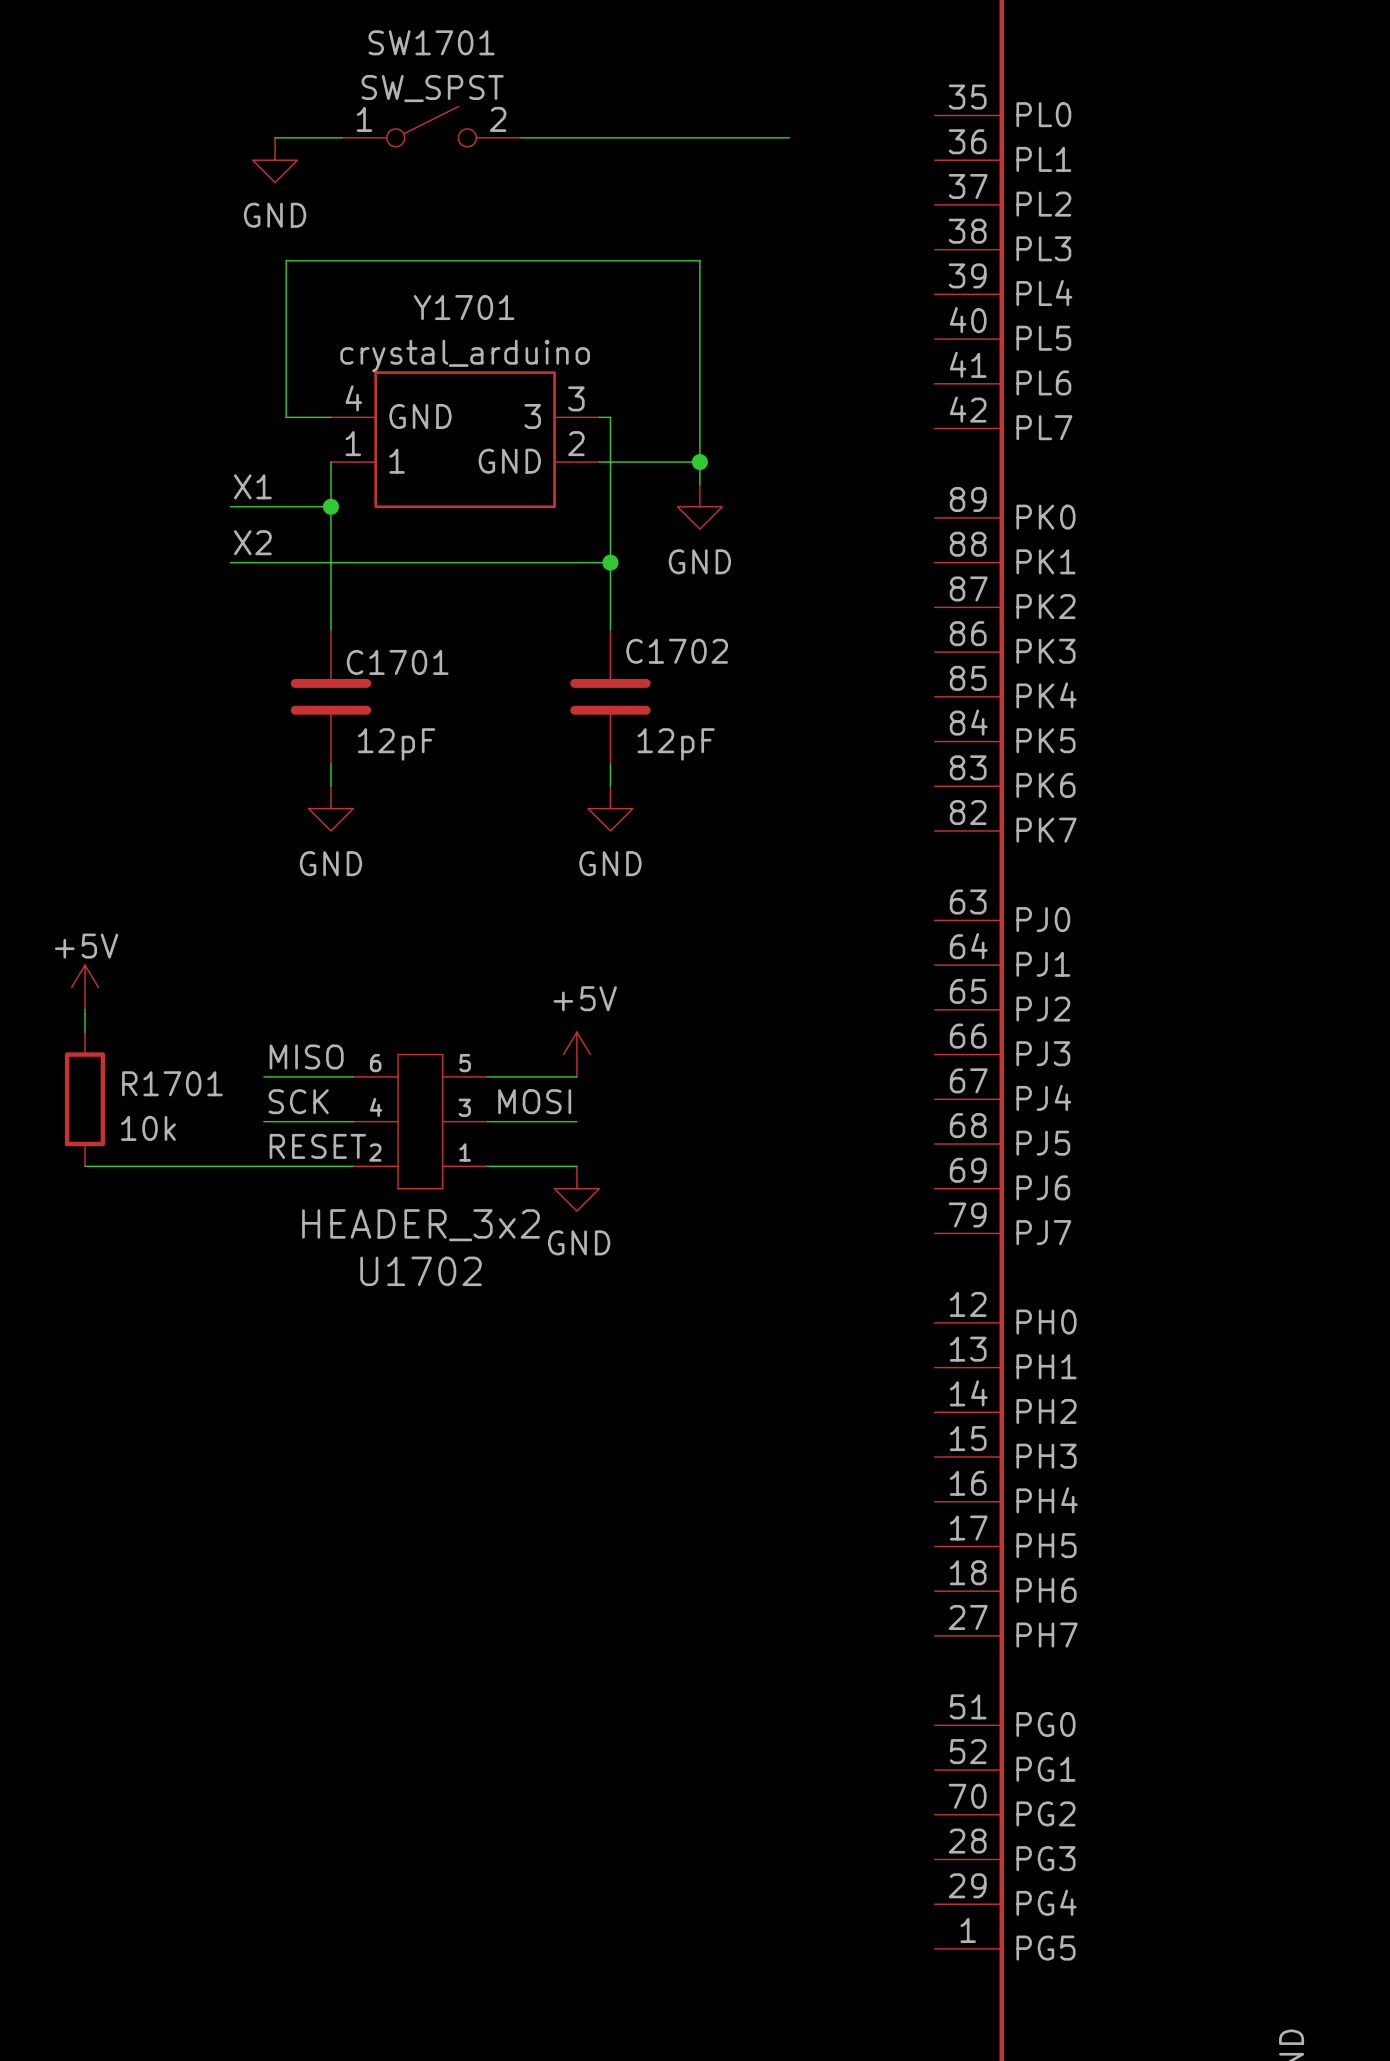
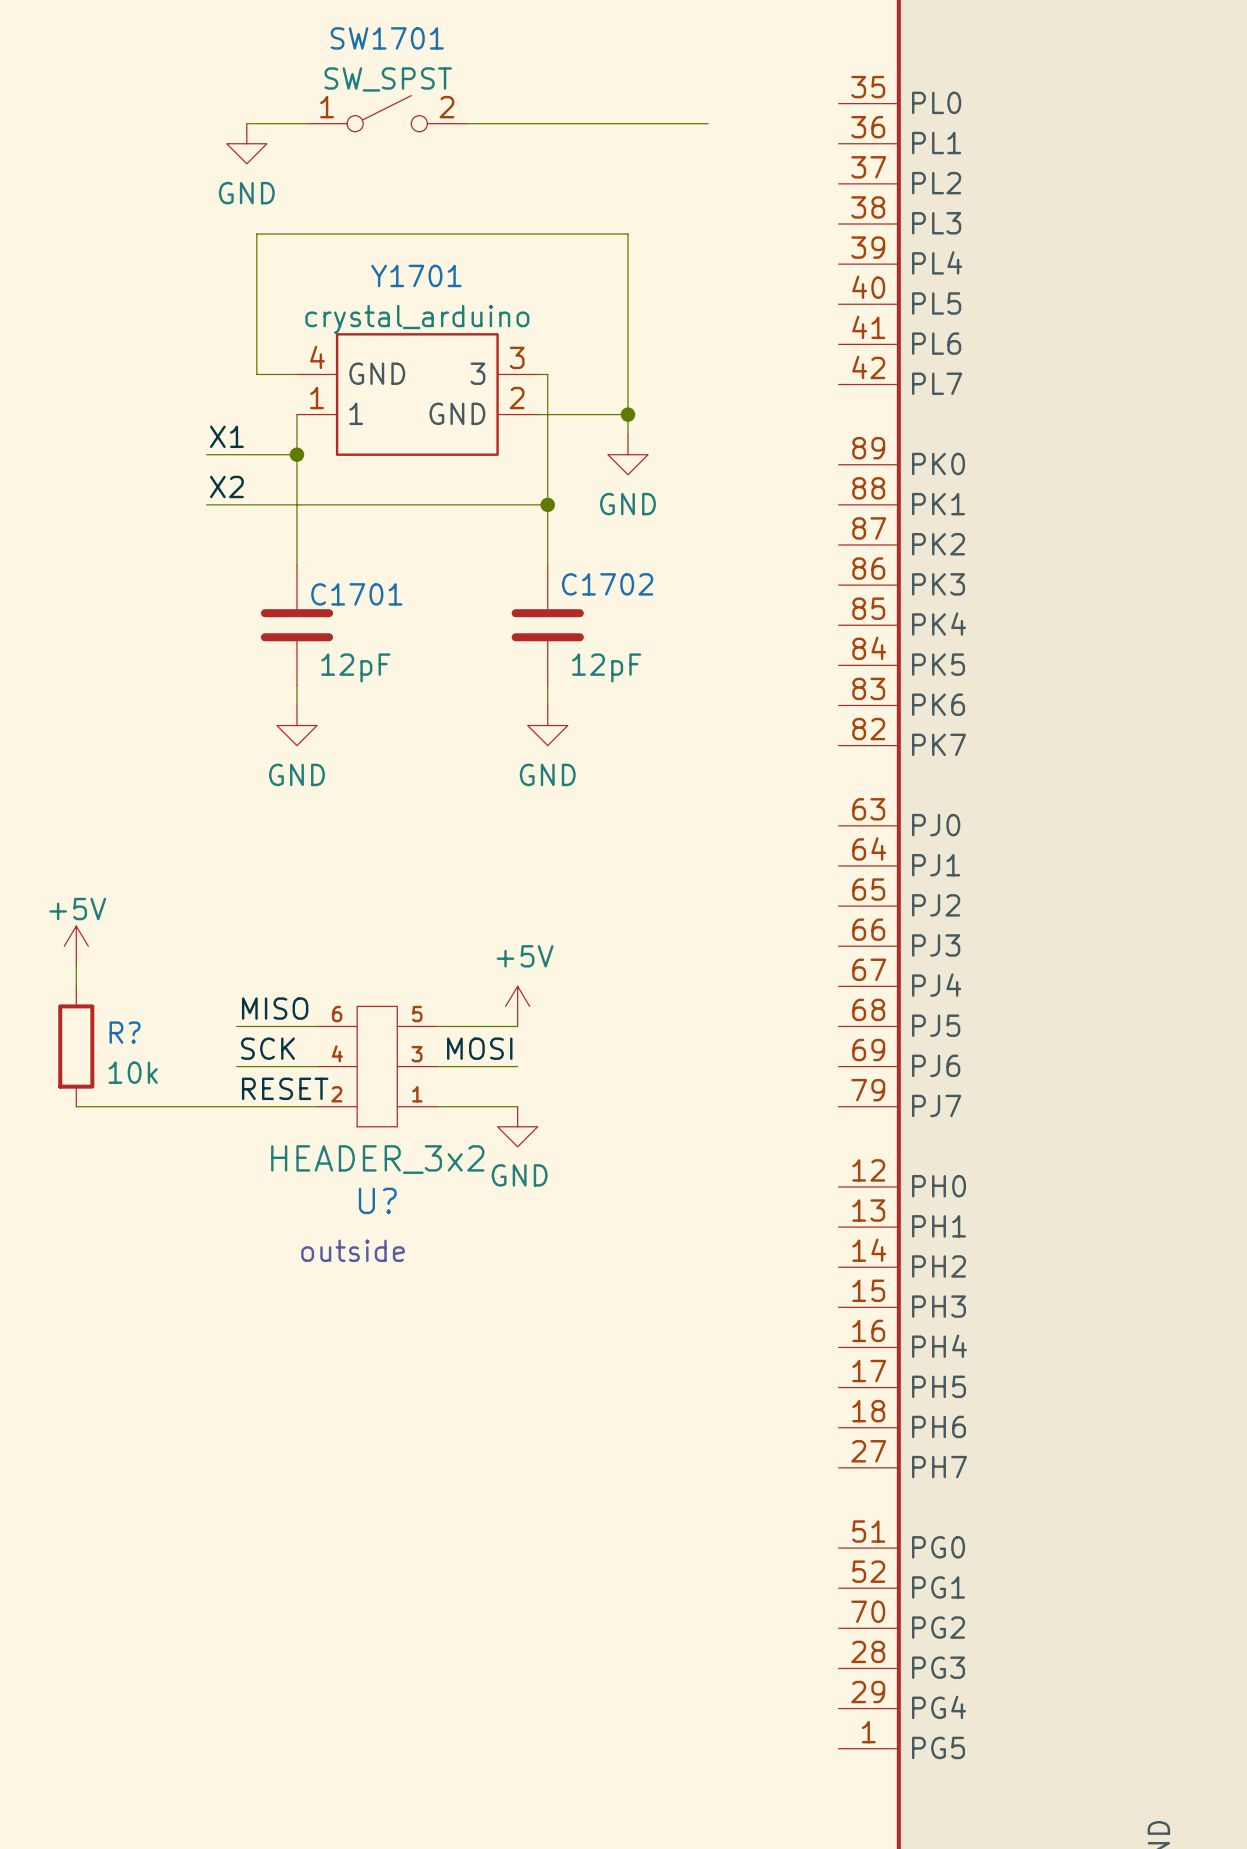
power symbol position: +5V (85, 987) -> +5V (76, 946)
wire: (85, 1009) (85, 1032) -> (76, 966) (76, 986)
power symbol position: +5V (576, 1054) -> +5V (517, 1006)
label position: MISO (306, 1056) -> MISO (275, 1008)
wire: (263, 1076) (353, 1076) -> (236, 1026) (317, 1026)
wire: (487, 1076) (576, 1076) -> (437, 1026) (517, 1026)
R1701: 10k (85, 1099) -> none
label position: SCK (298, 1101) -> SCK (267, 1048)
label position: MOSI (534, 1101) -> MOSI (479, 1048)
wire: (263, 1121) (353, 1121) -> (236, 1066) (317, 1066)
U1702: HEADER_3x2 (420, 1121) -> none
wire: (487, 1121) (576, 1121) -> (437, 1066) (517, 1066)
label position: RESET (317, 1146) -> RESET (285, 1088)
wire: (85, 1166) (353, 1166) -> (76, 1106) (317, 1106)
R?: none -> 10k (76, 1046)
wire: (487, 1166) (576, 1166) -> (437, 1106) (517, 1106)
U?: none -> HEADER_3x2 (377, 1066)
power symbol position: GND (576, 1188) -> GND (517, 1126)
text: none -> outside (353, 1250)

